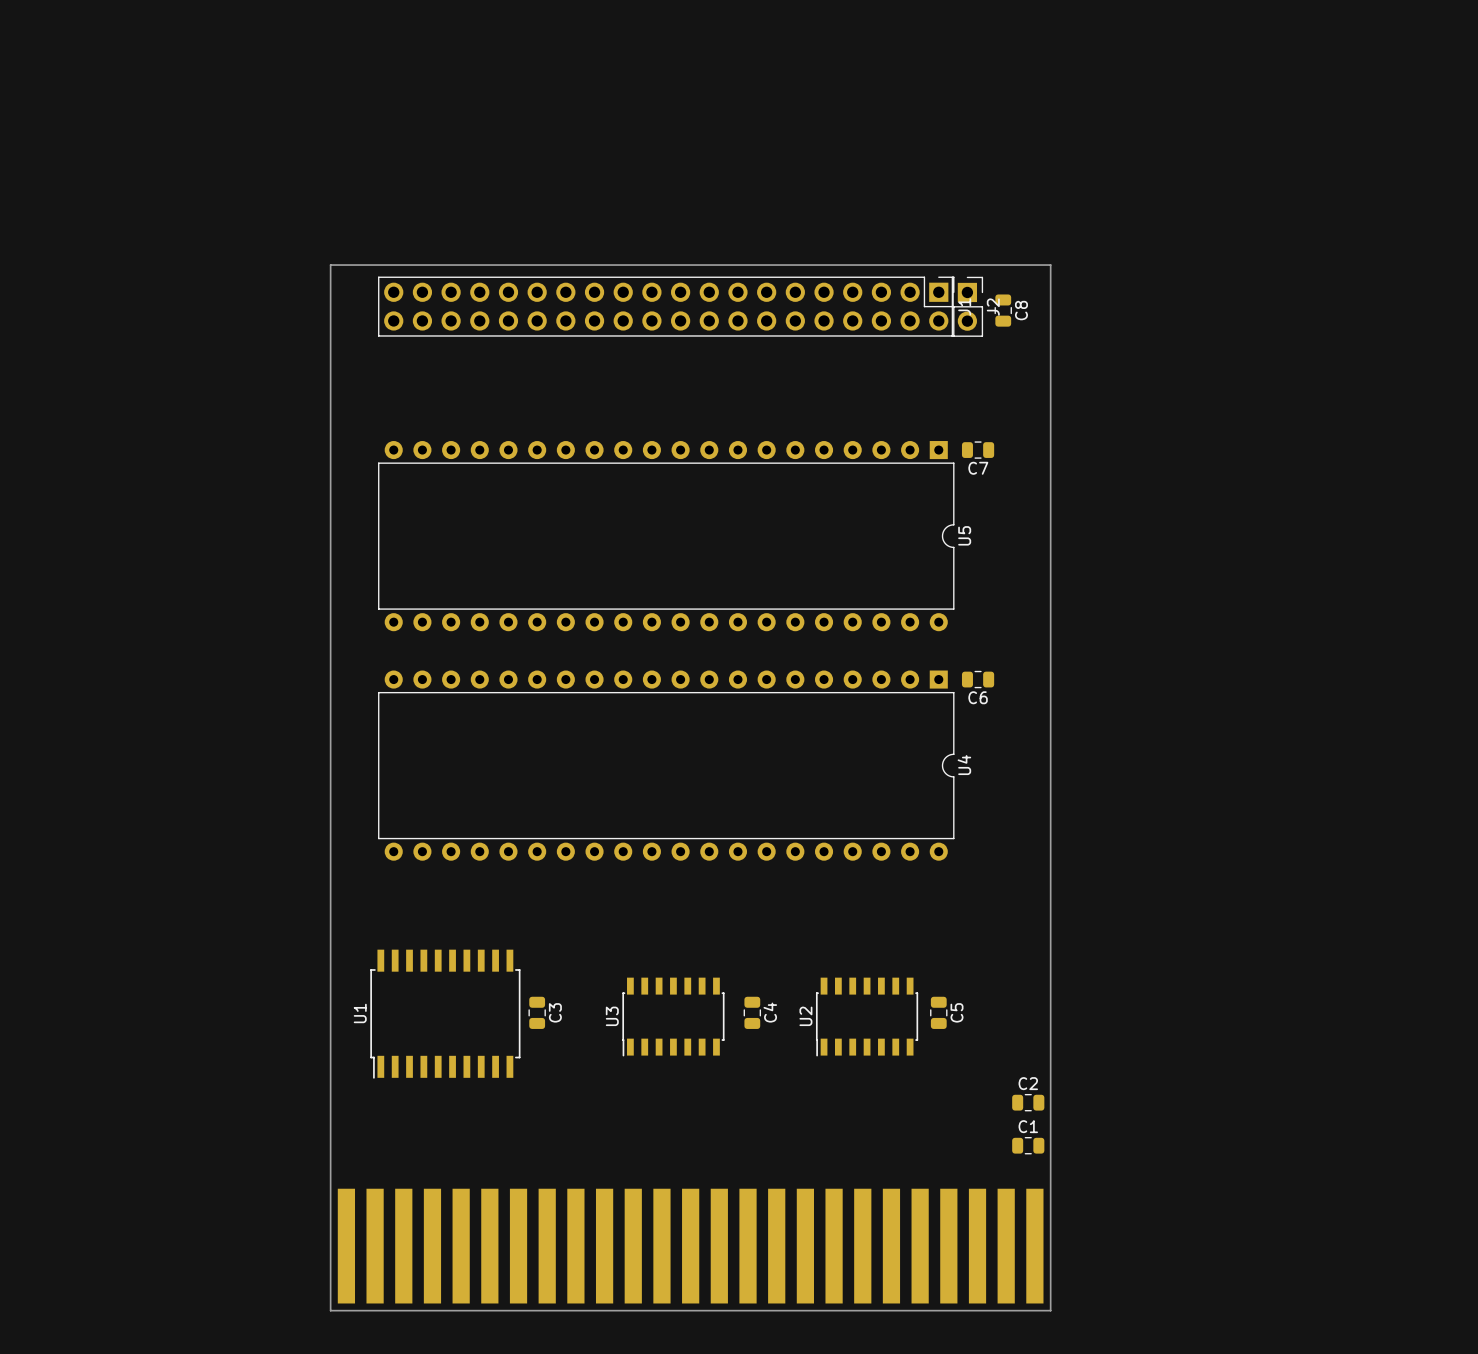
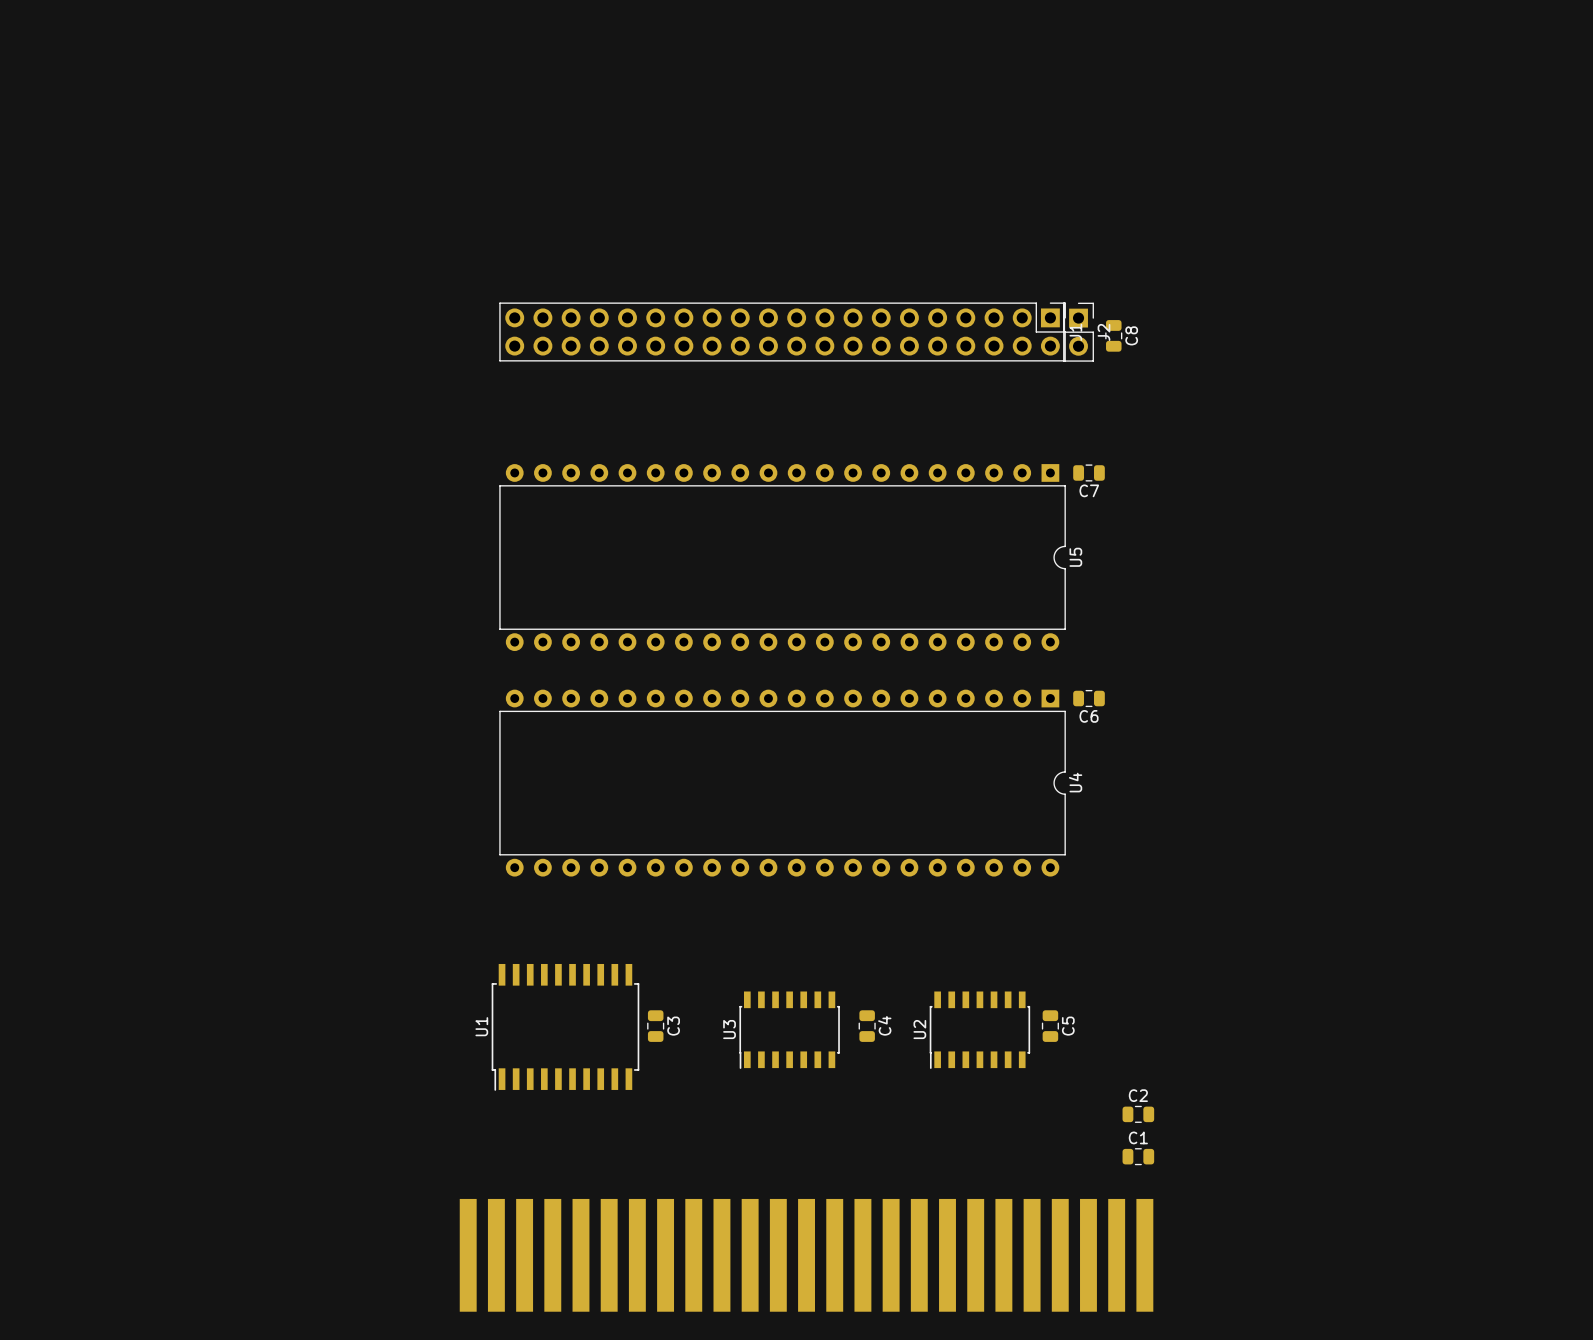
board edge: (330, 265) (330, 1310) (1050, 1310) (1050, 265) (330, 265) -> none

